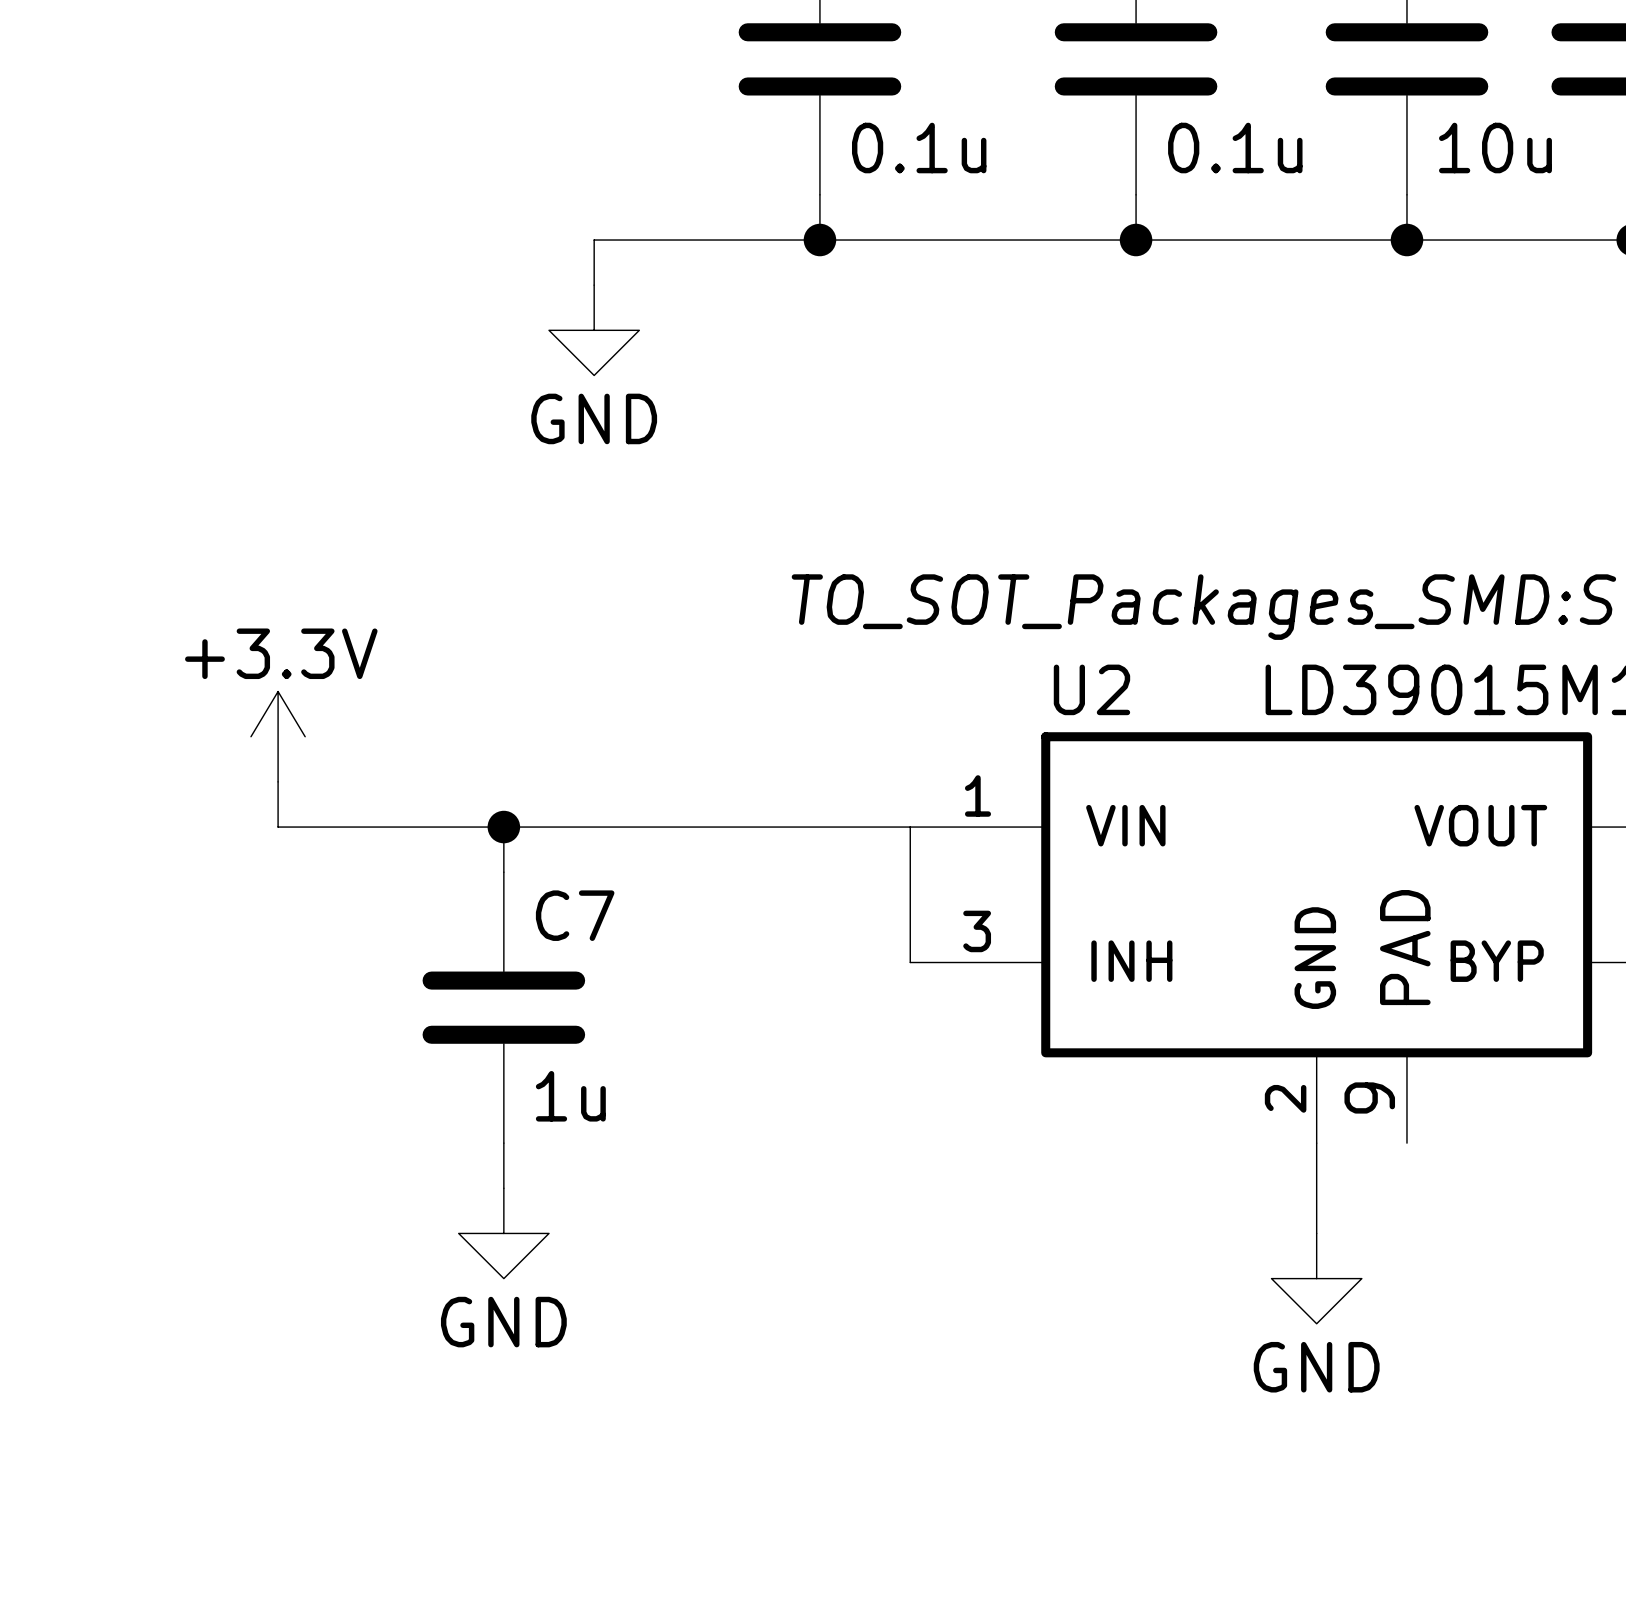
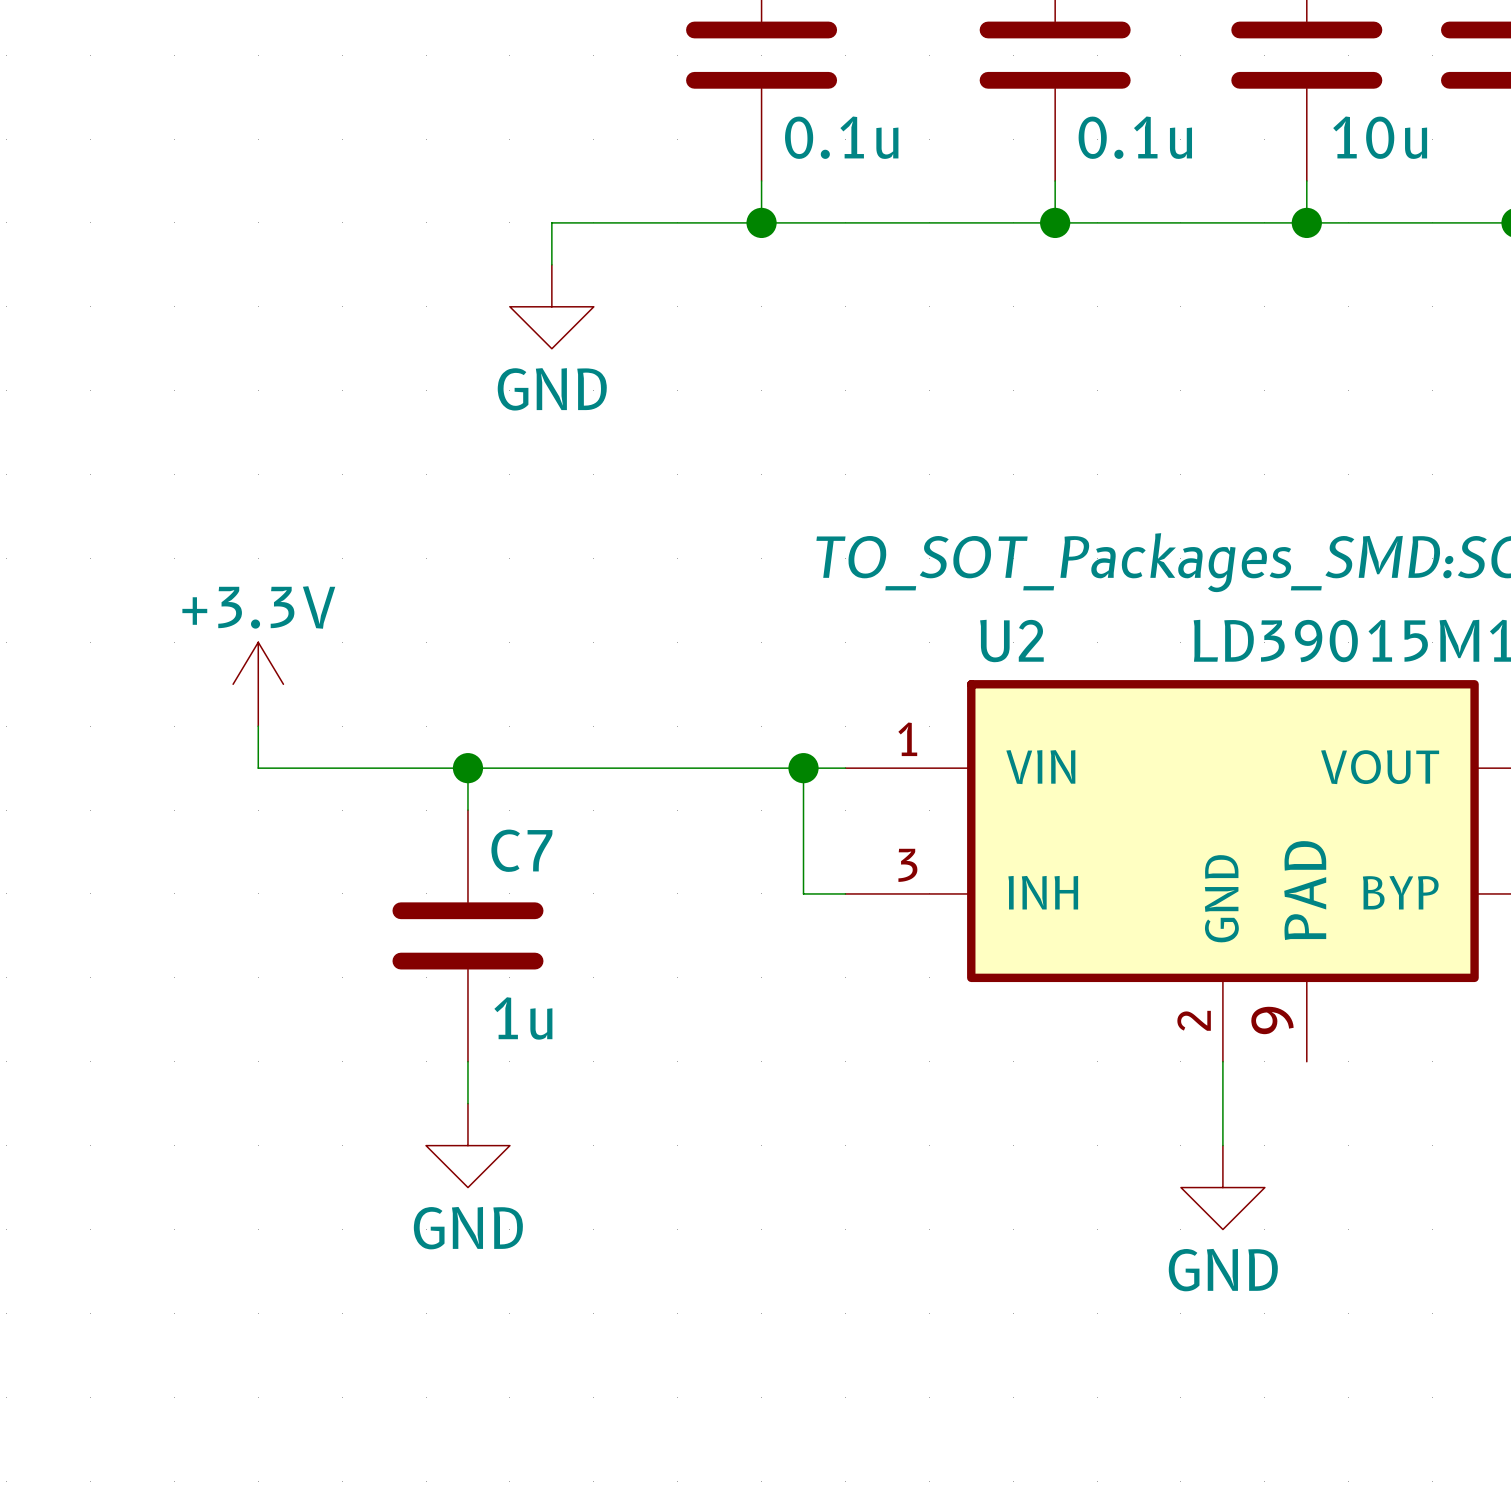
junction: none -> (803, 768)
wire: (910, 827) (910, 962) -> (803, 768) (803, 893) (845, 893)

